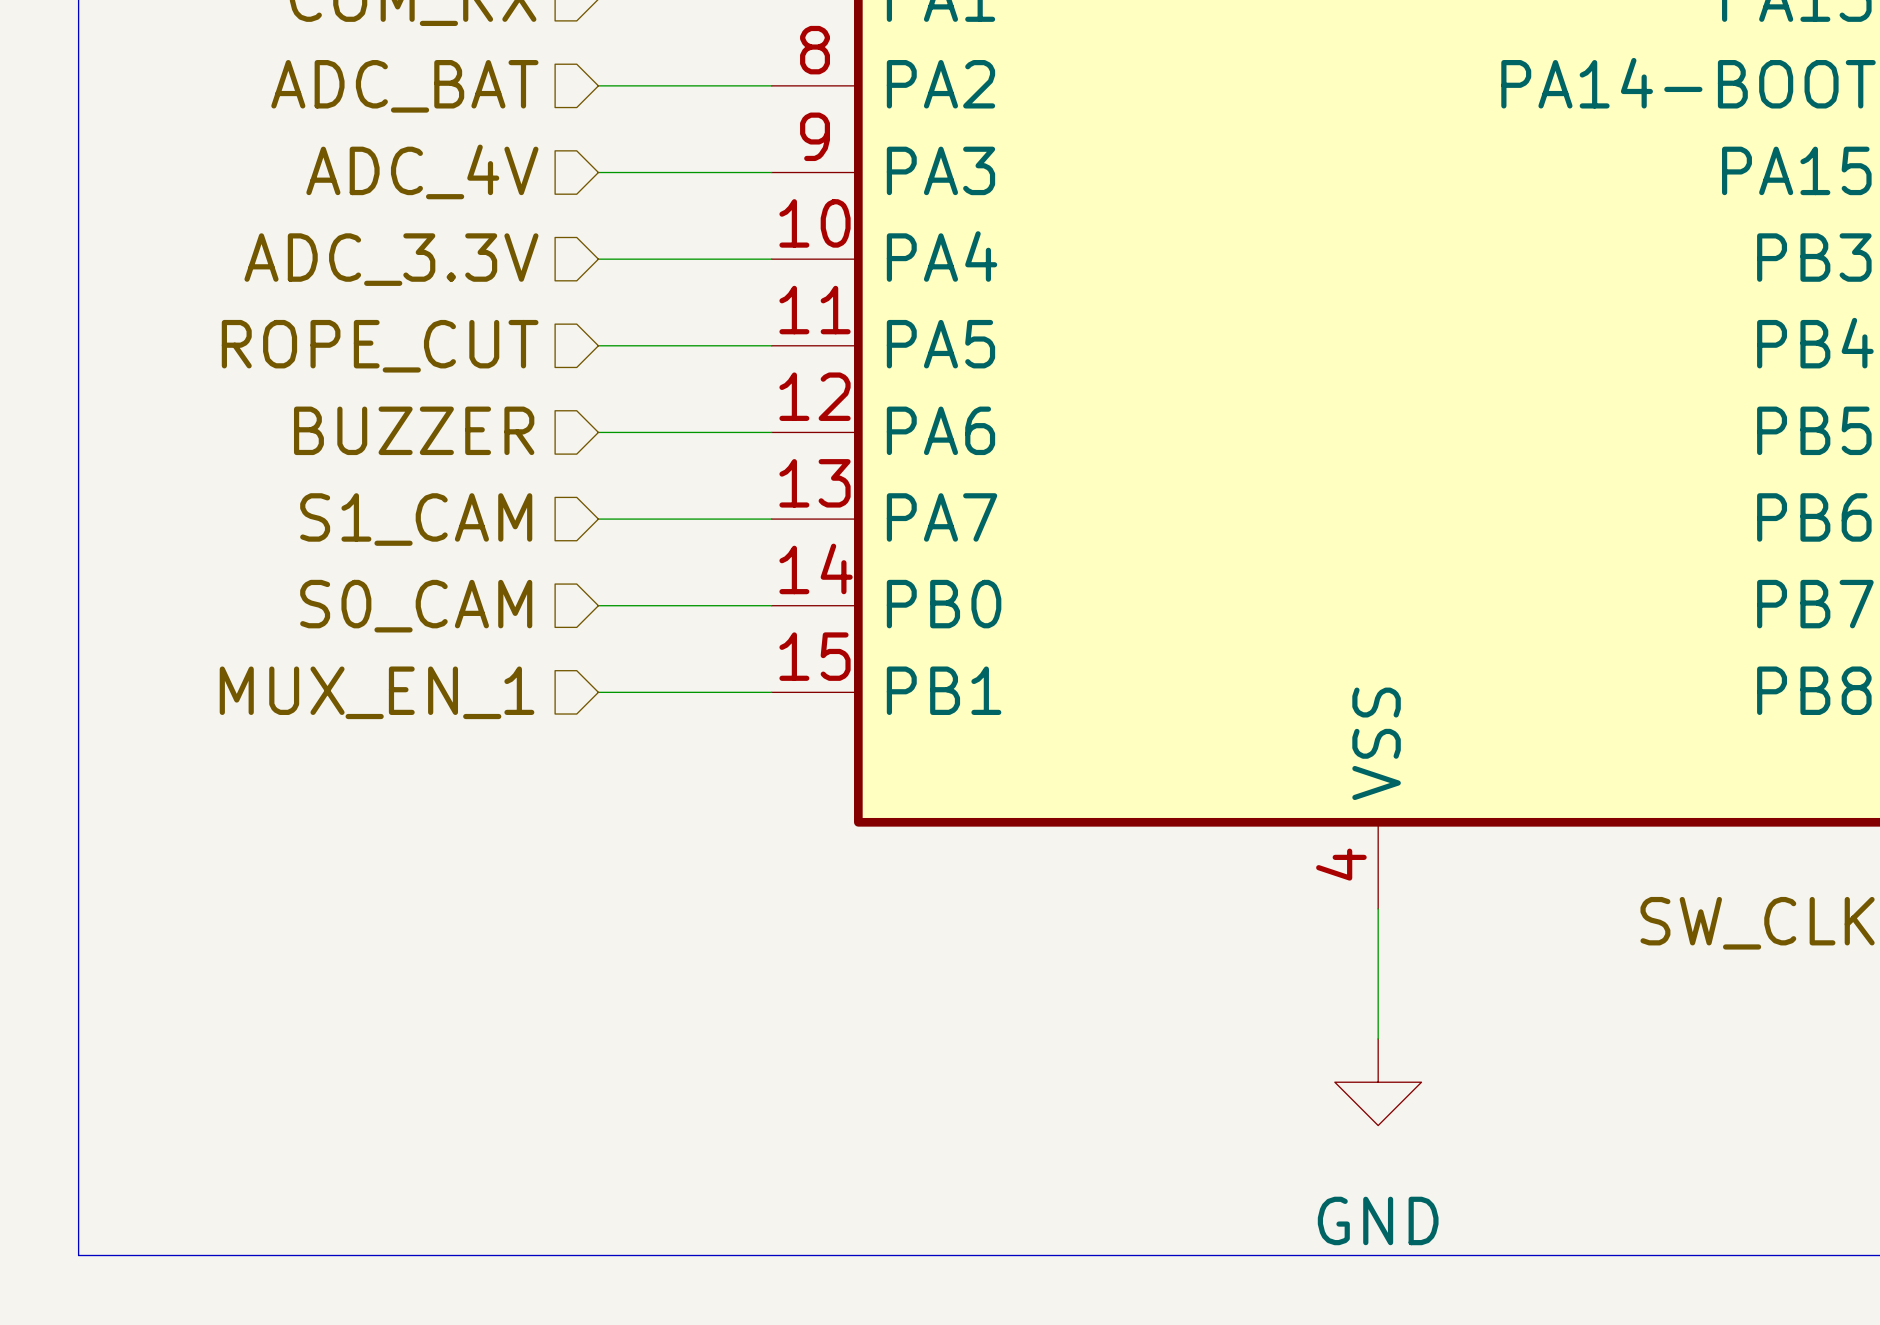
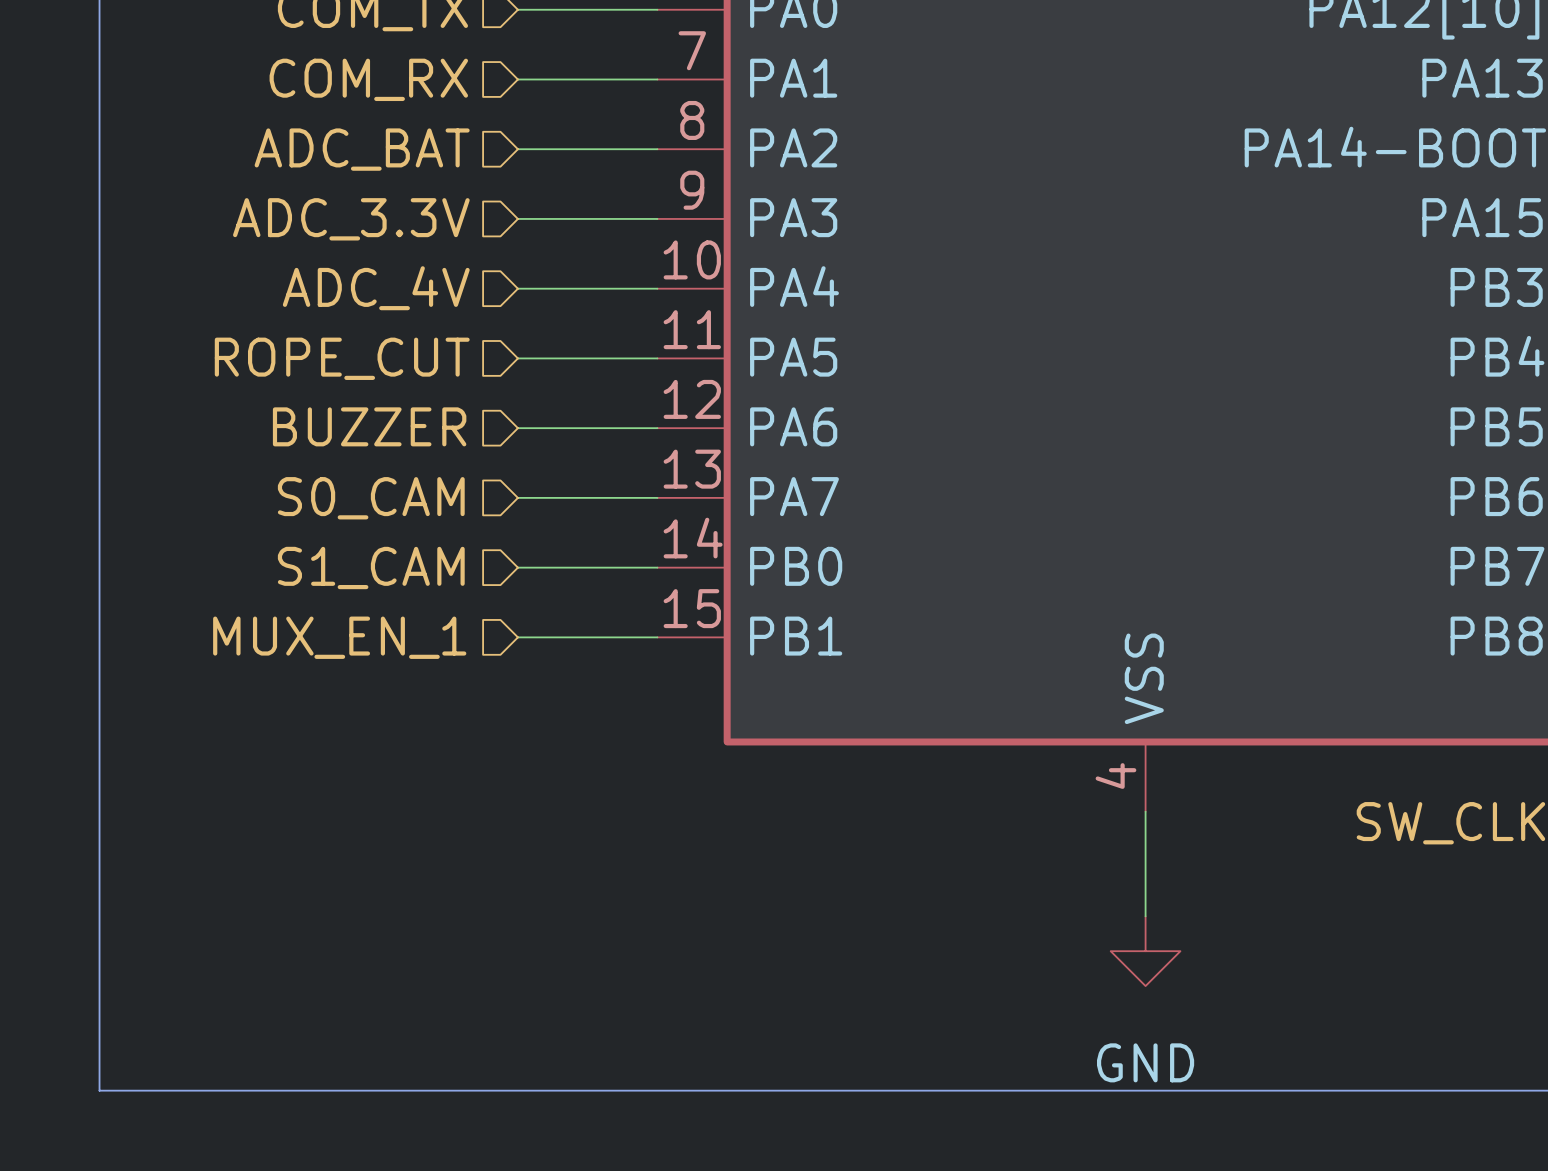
hierarchical label: ADC_4V (422, 171) -> ADC_3.3V (351, 219)
hierarchical label: ADC_3.3V (391, 259) -> ADC_4V (376, 288)
hierarchical label: S1_CAM (416, 519) -> S0_CAM (371, 498)
hierarchical label: S0_CAM (416, 606) -> S1_CAM (371, 567)

